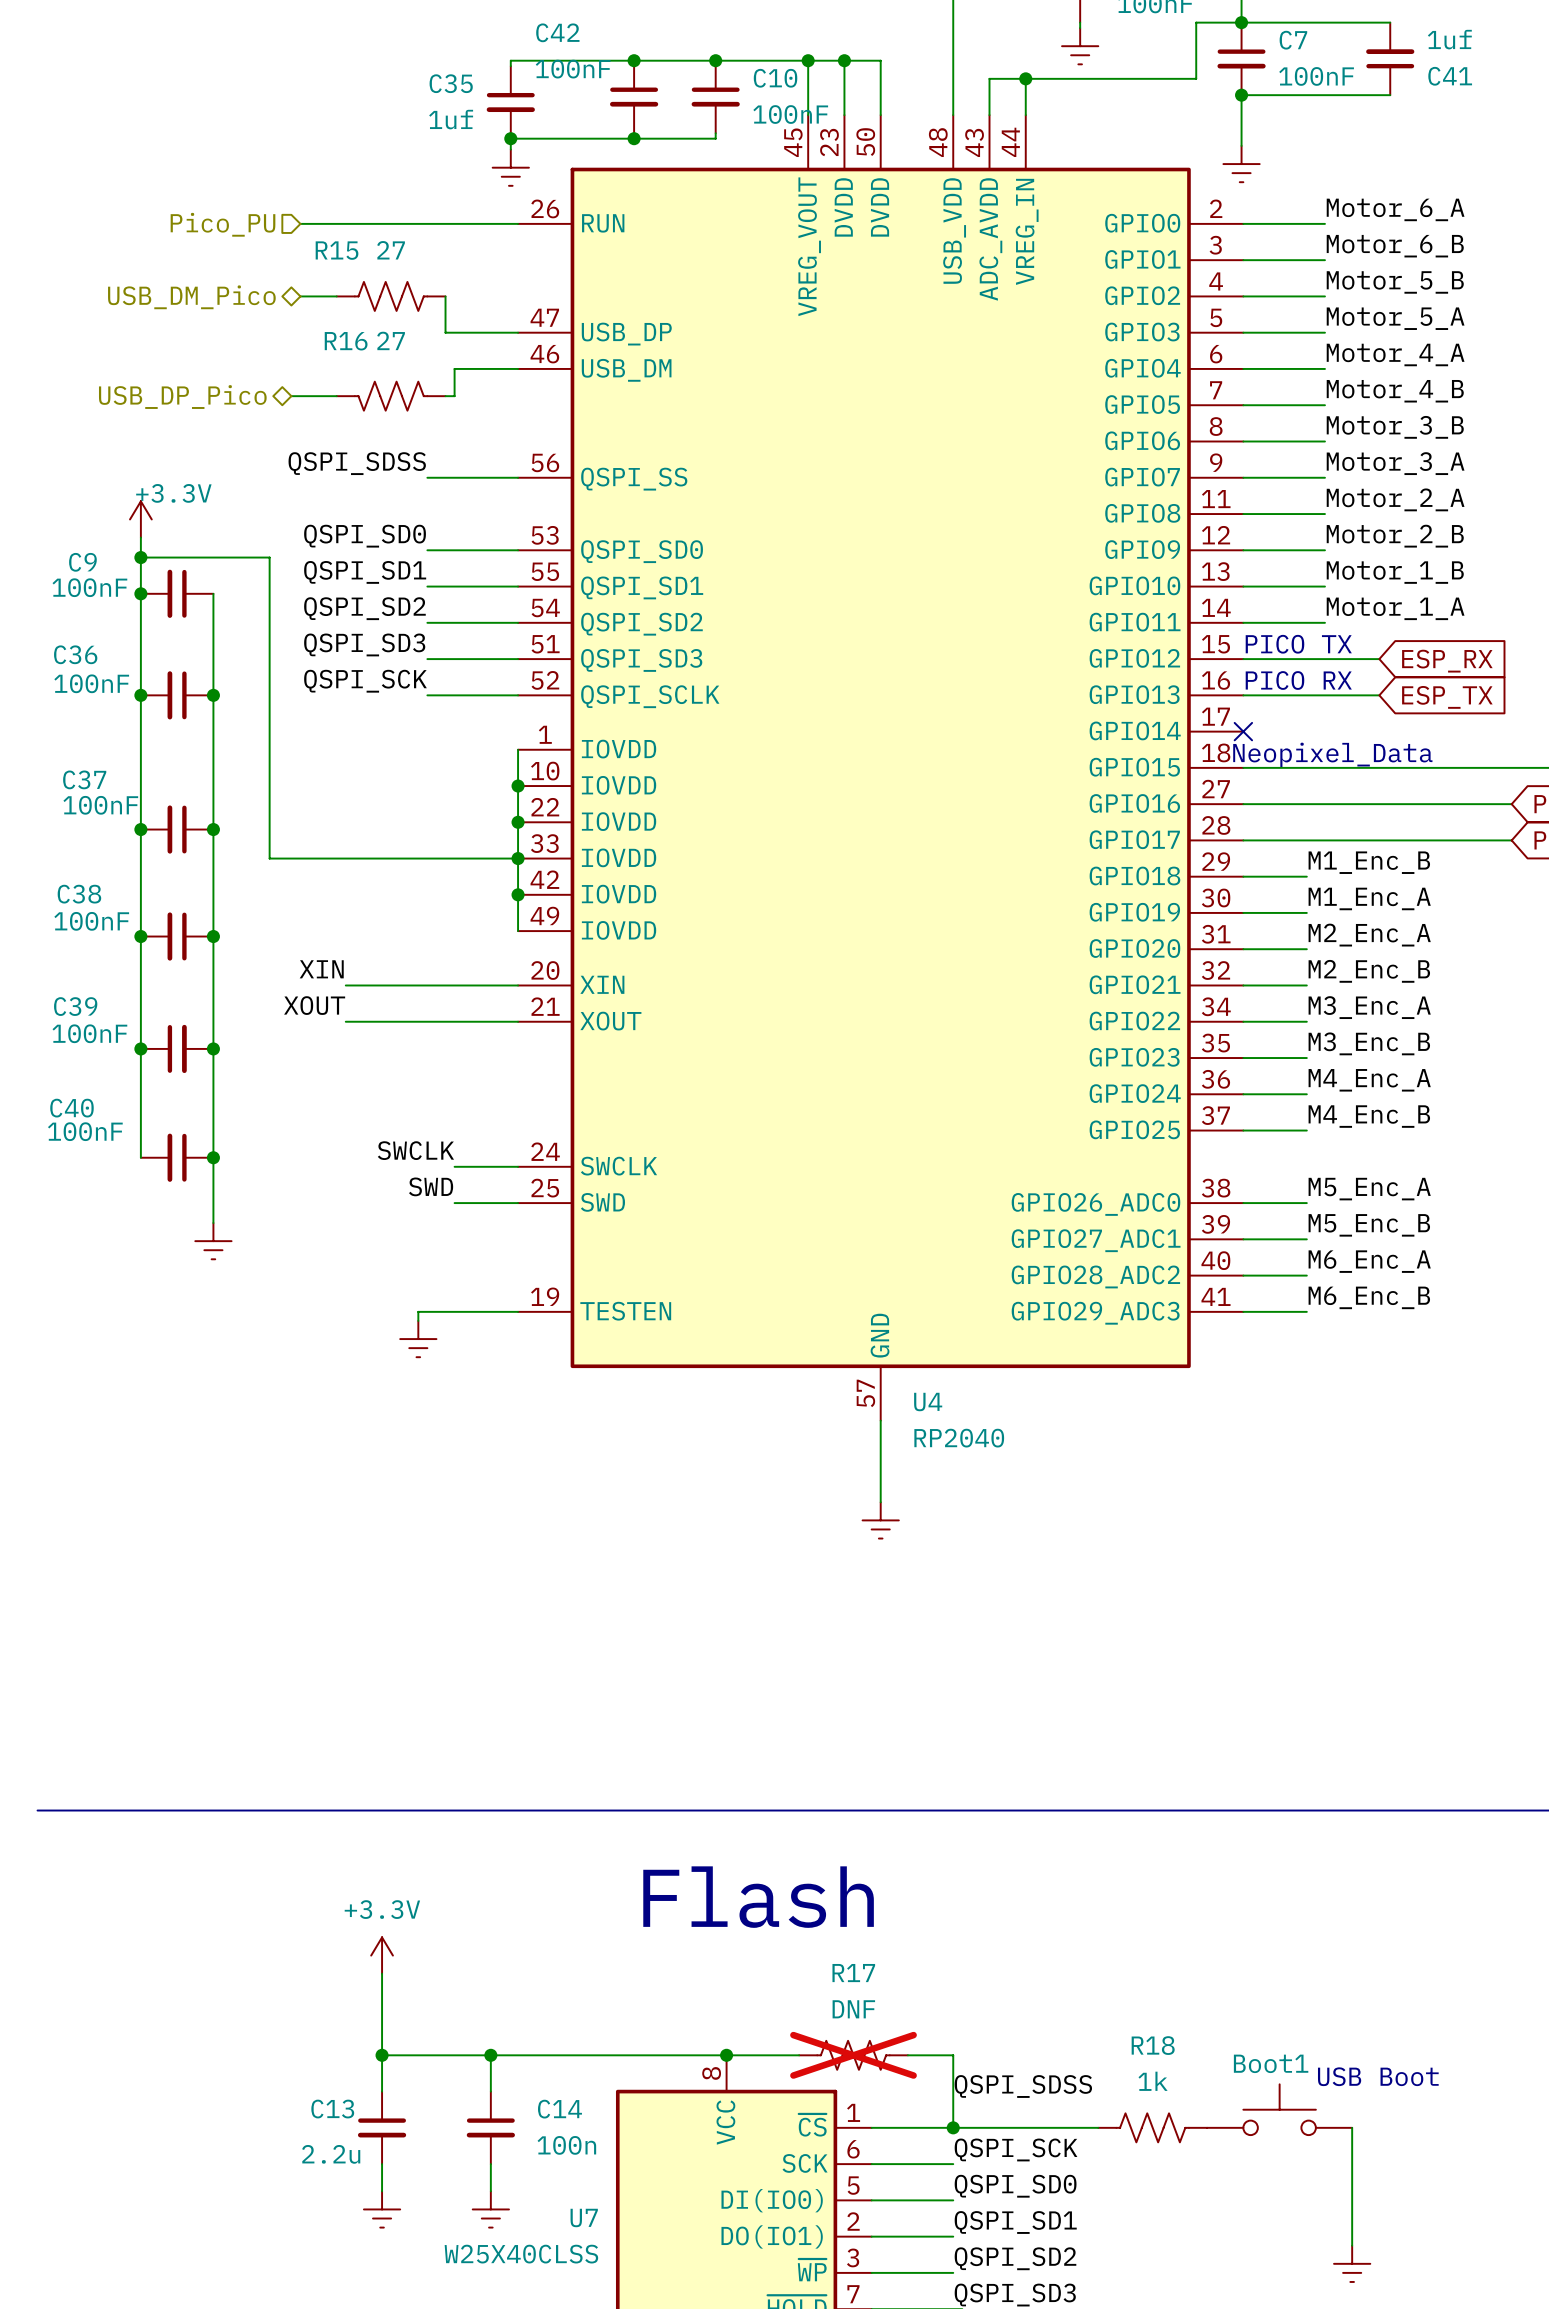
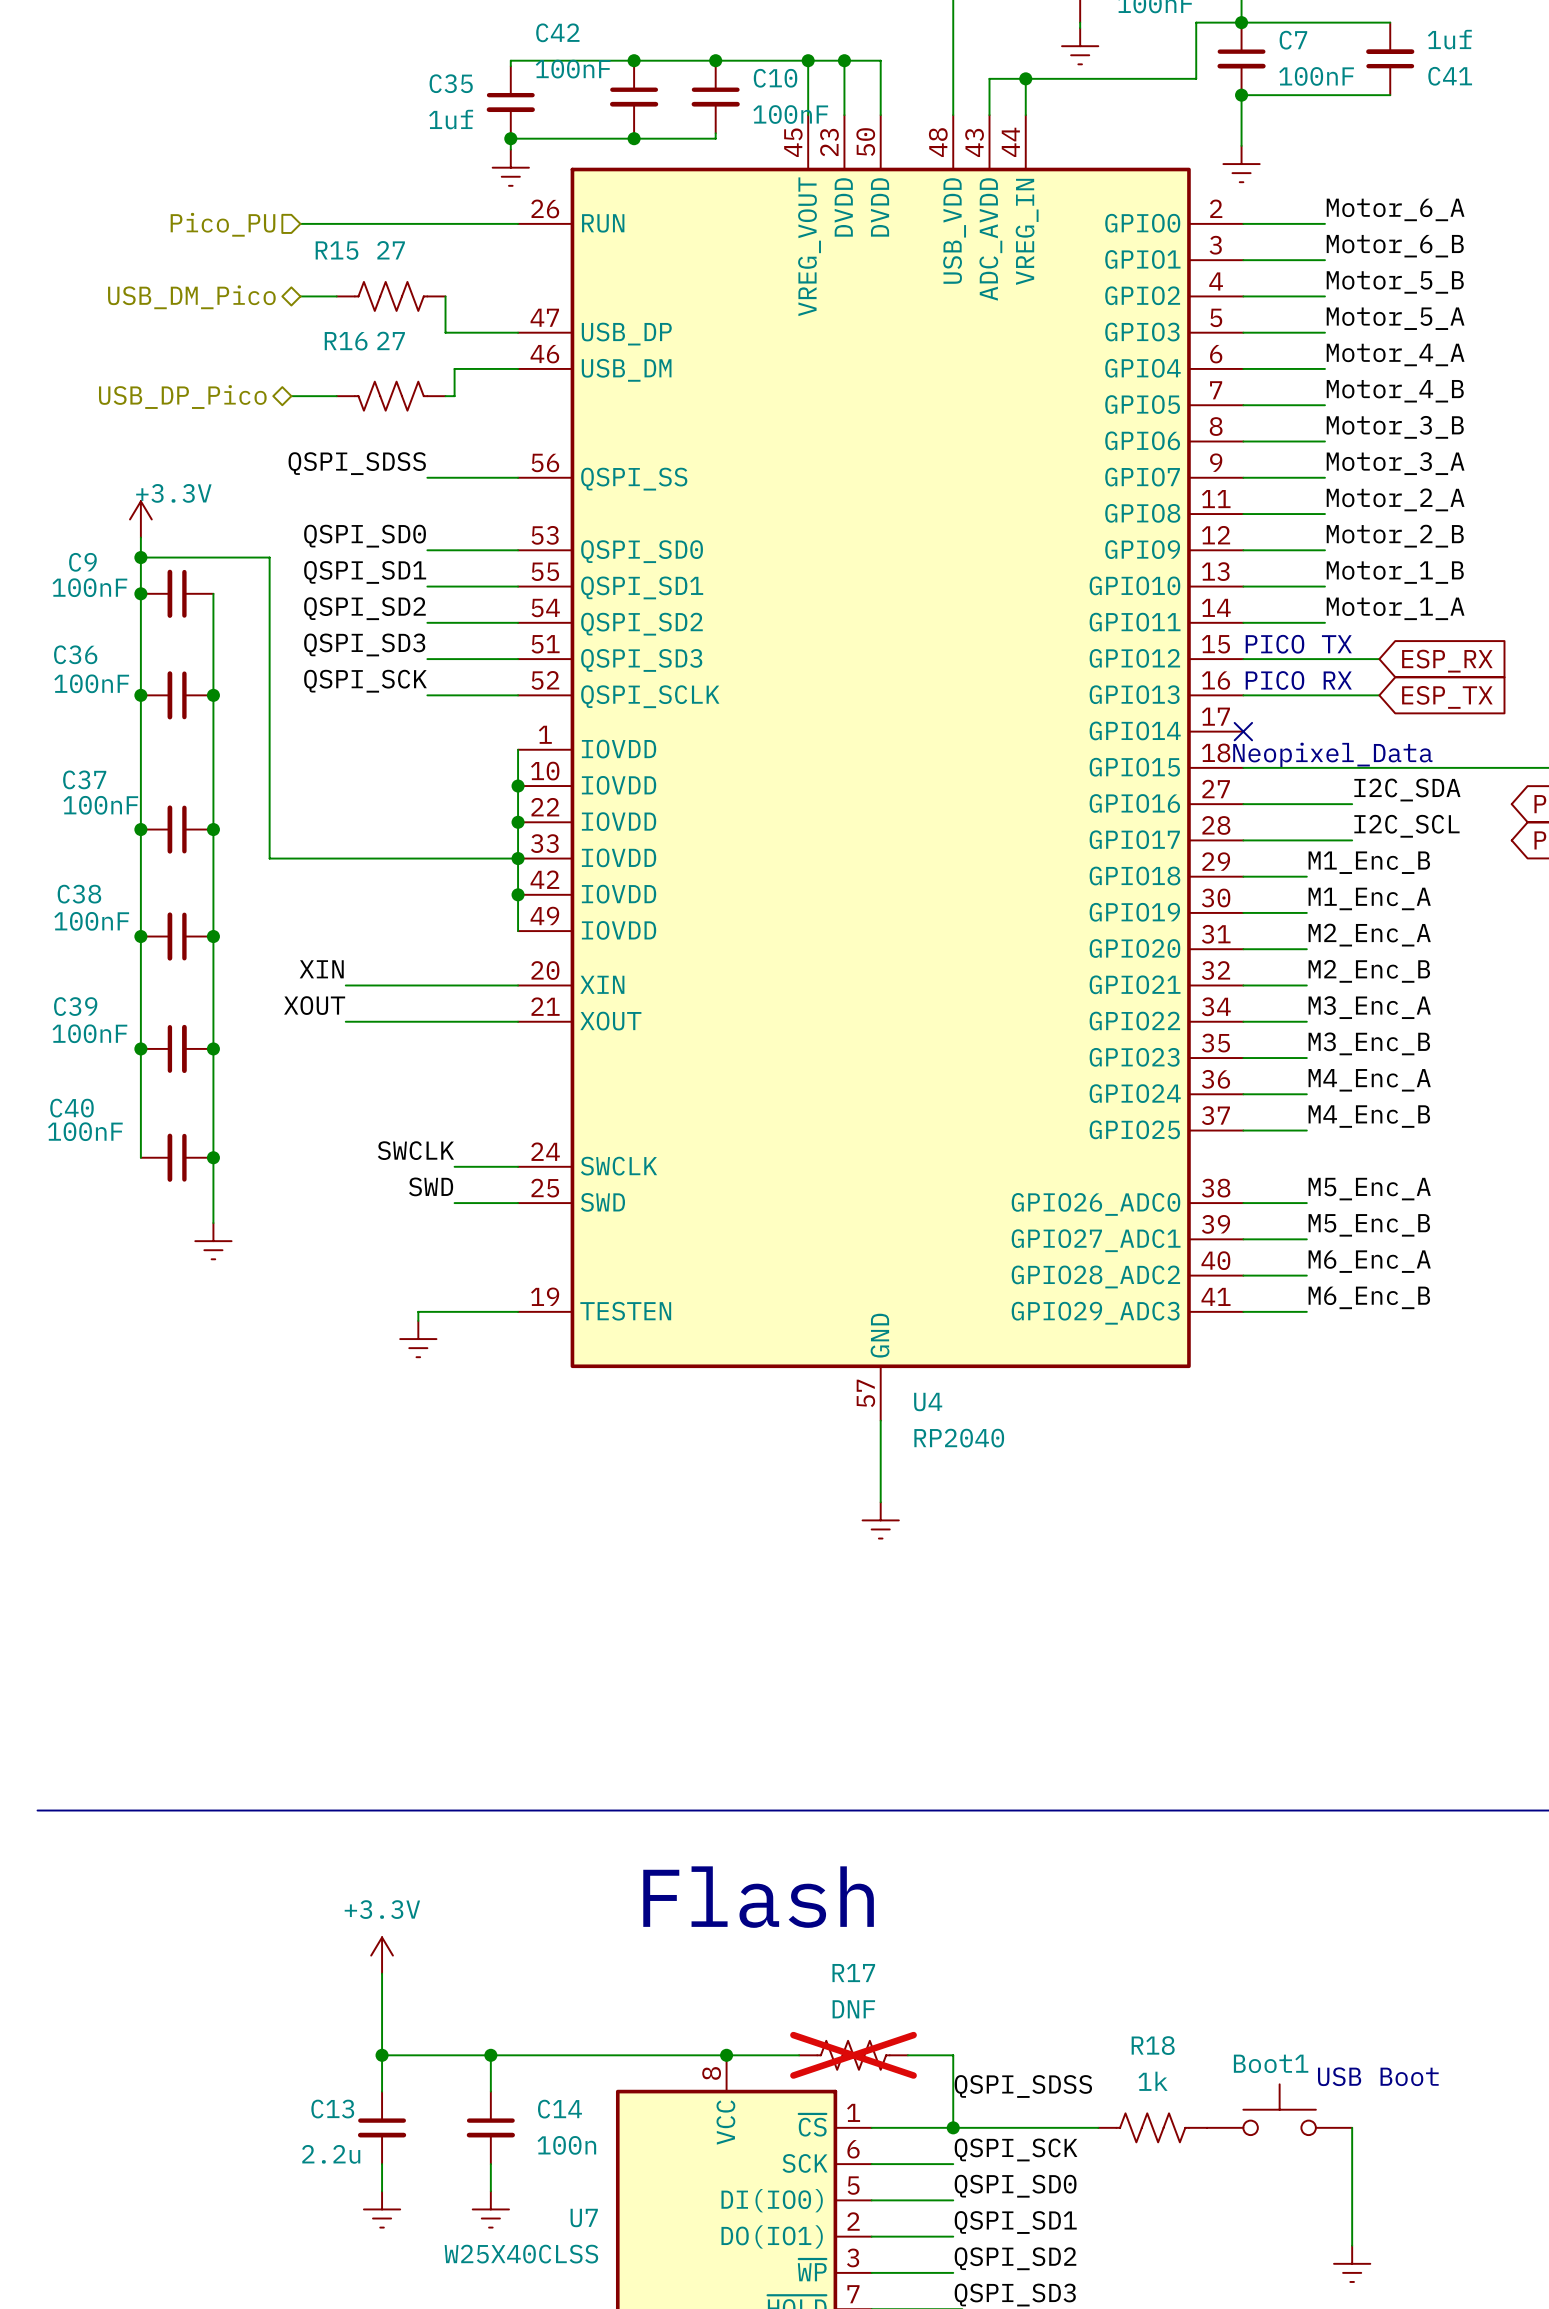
label: none -> I2C_SDA (1407, 790)
wire: (1352, 804) (1511, 804) -> none
label: none -> I2C_SCL (1406, 826)
wire: (1352, 840) (1511, 840) -> none

